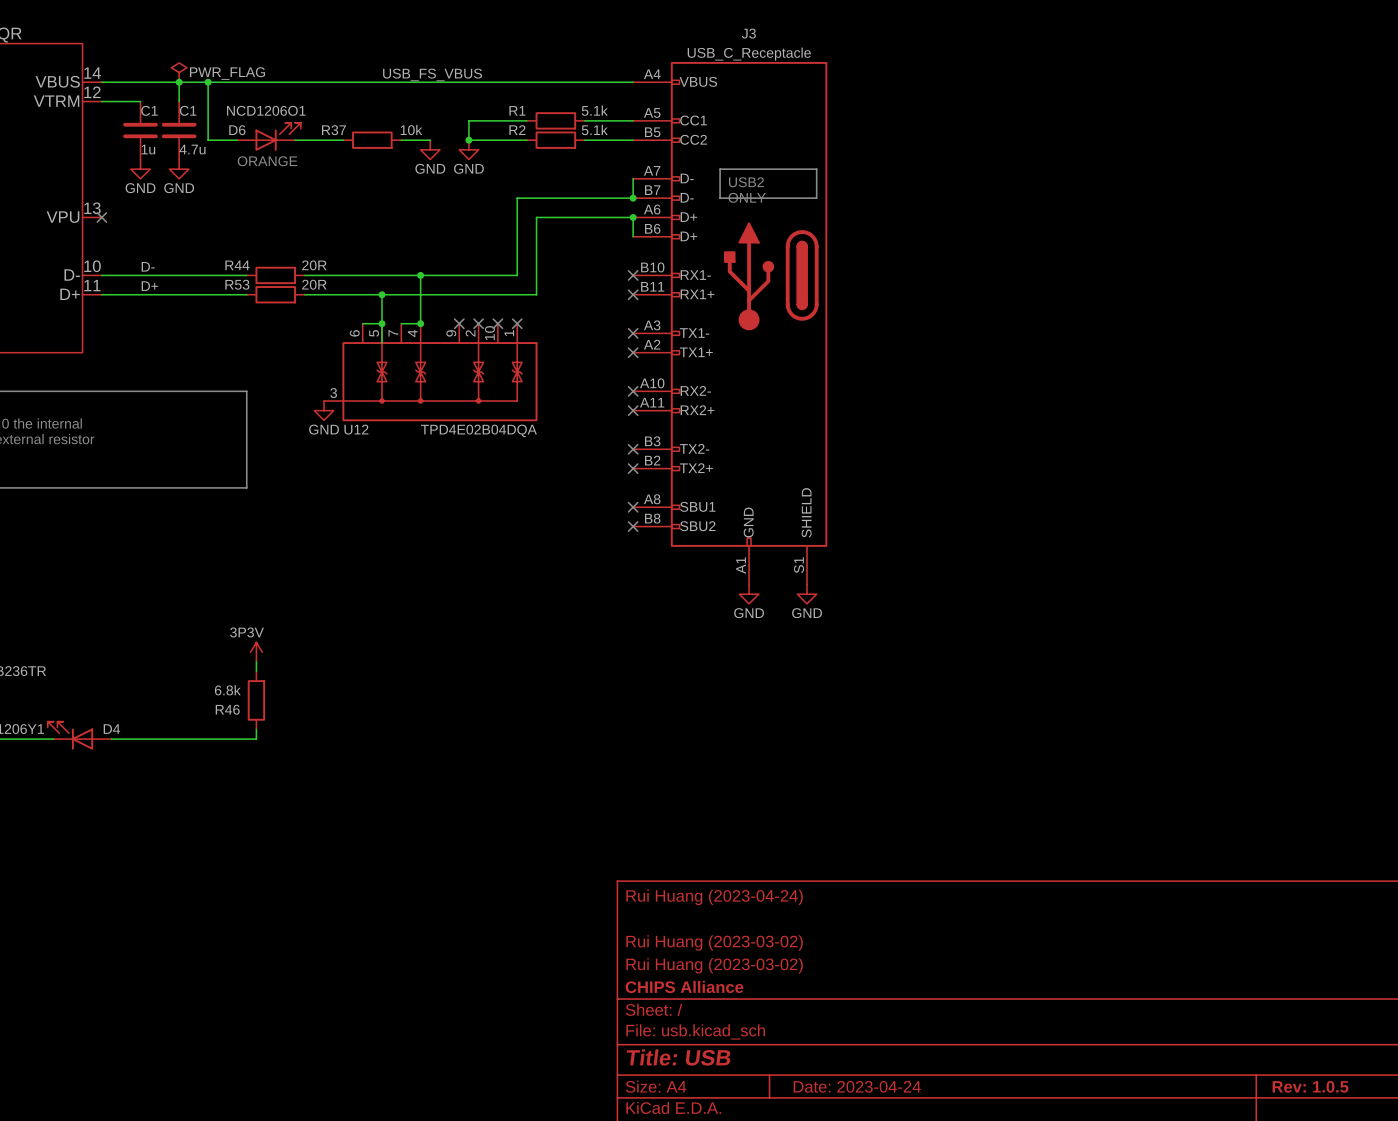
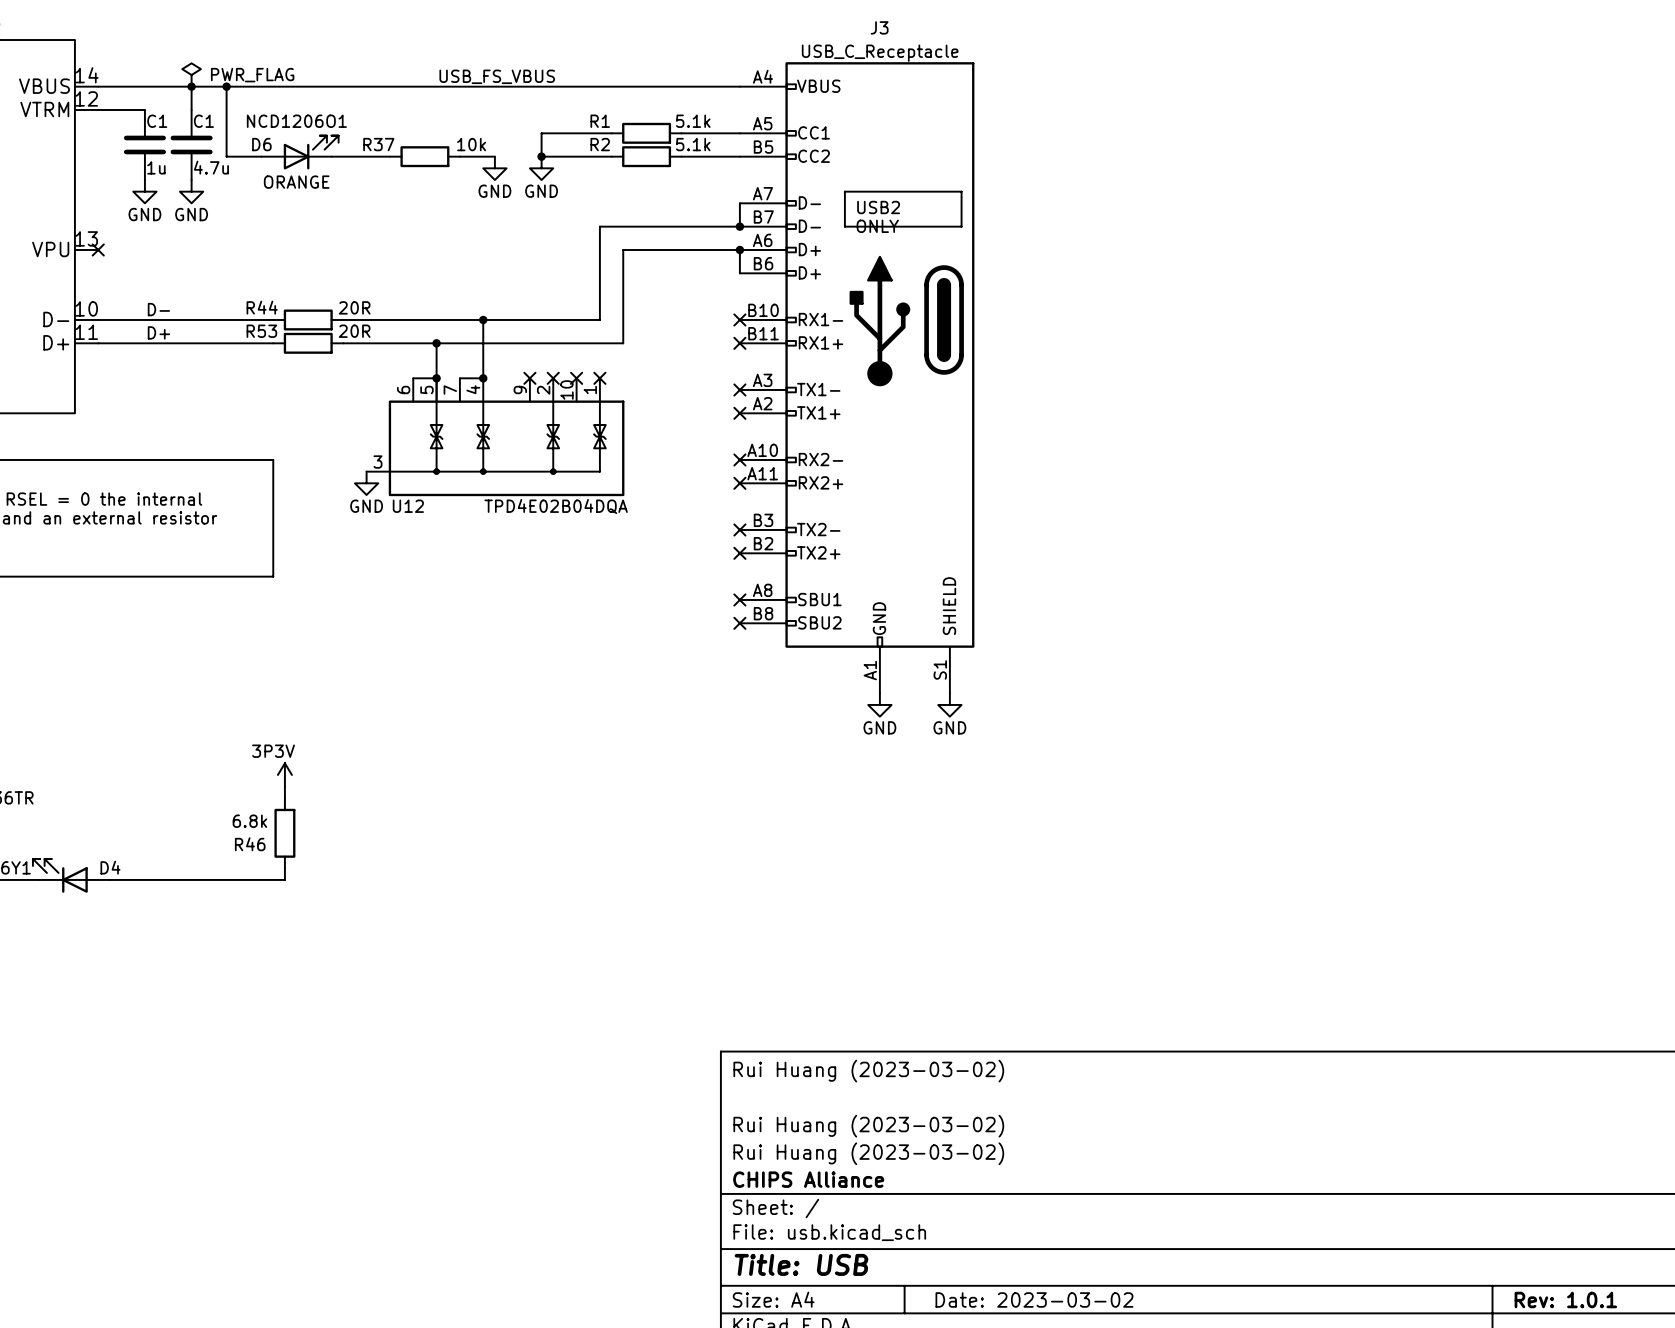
title block: Rui Huang (2023-04-24) (714, 897) -> Rui Huang (2023-03-02) (868, 1071)
title block: Date: 2023-04-24 (857, 1086) -> Date: 2023-03-02 (1034, 1299)
title block: Rev: 1.0.5 (1310, 1086) -> Rev: 1.0.1 (1565, 1299)

